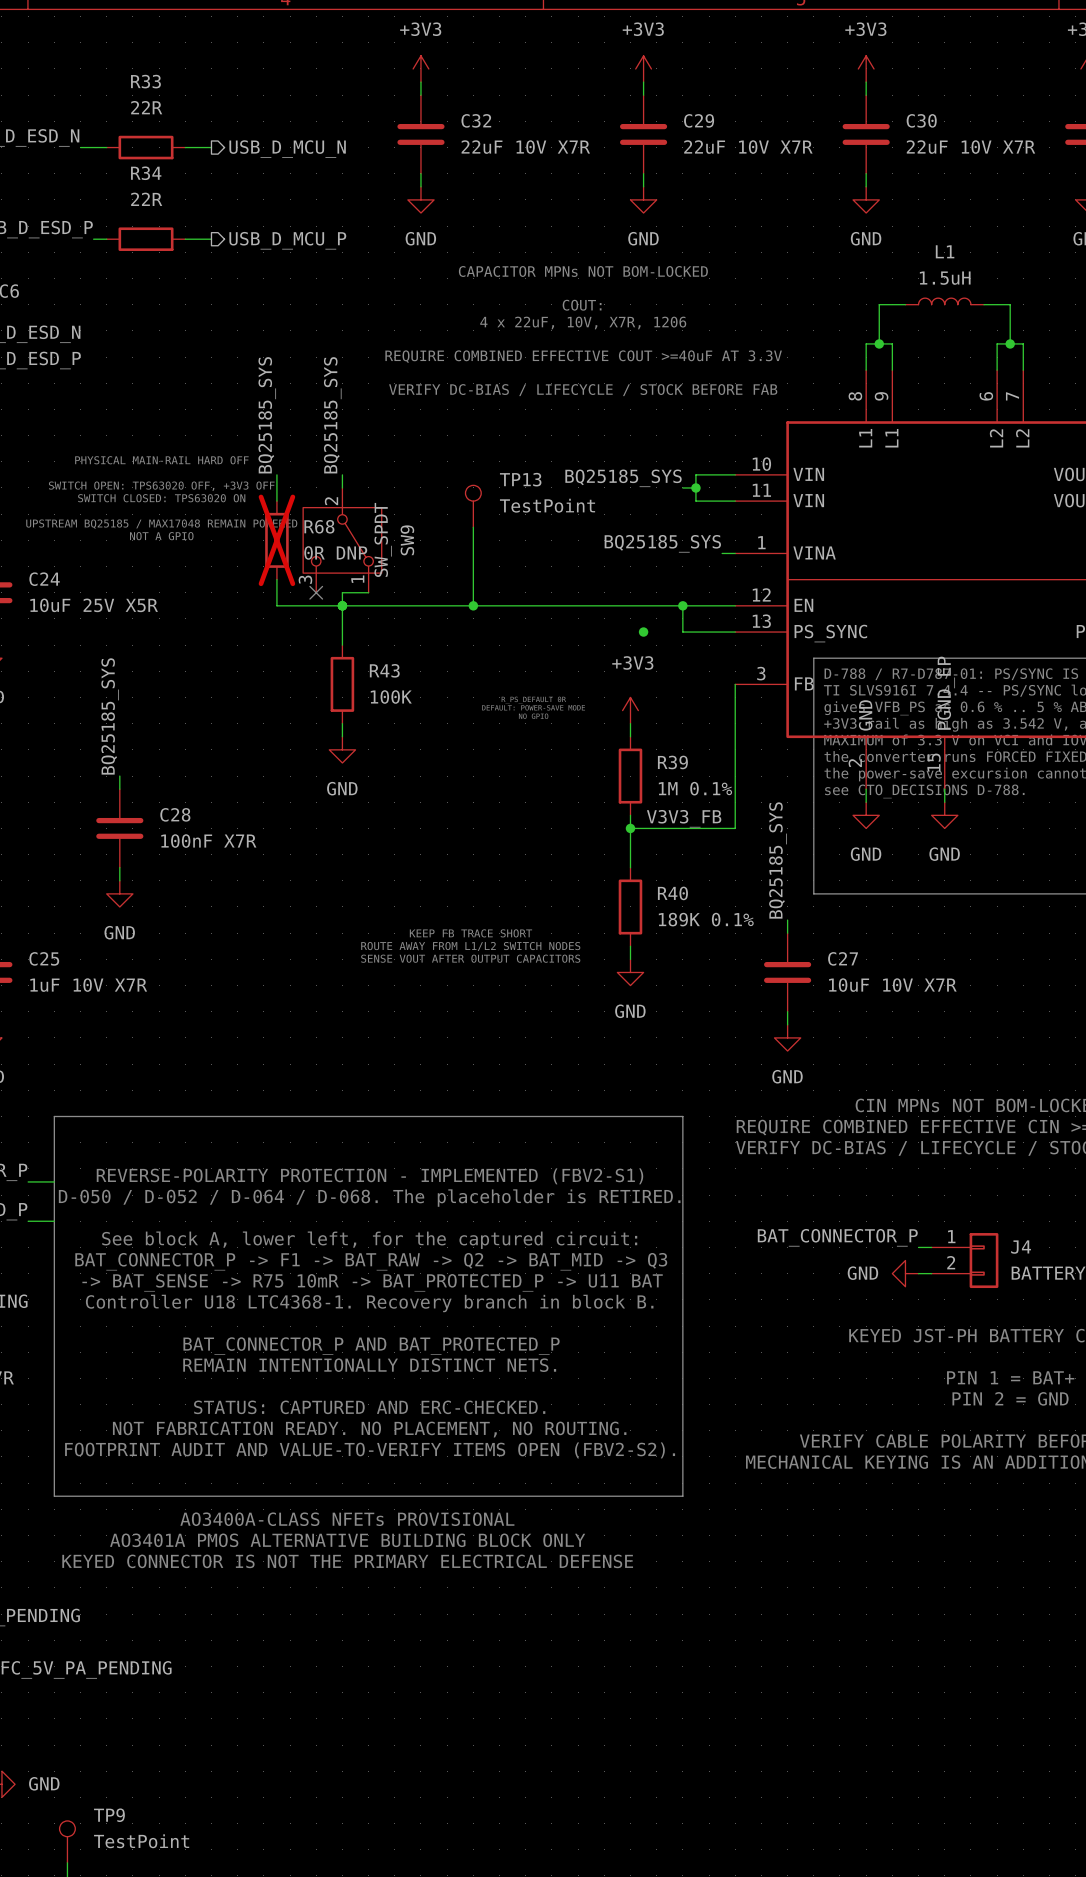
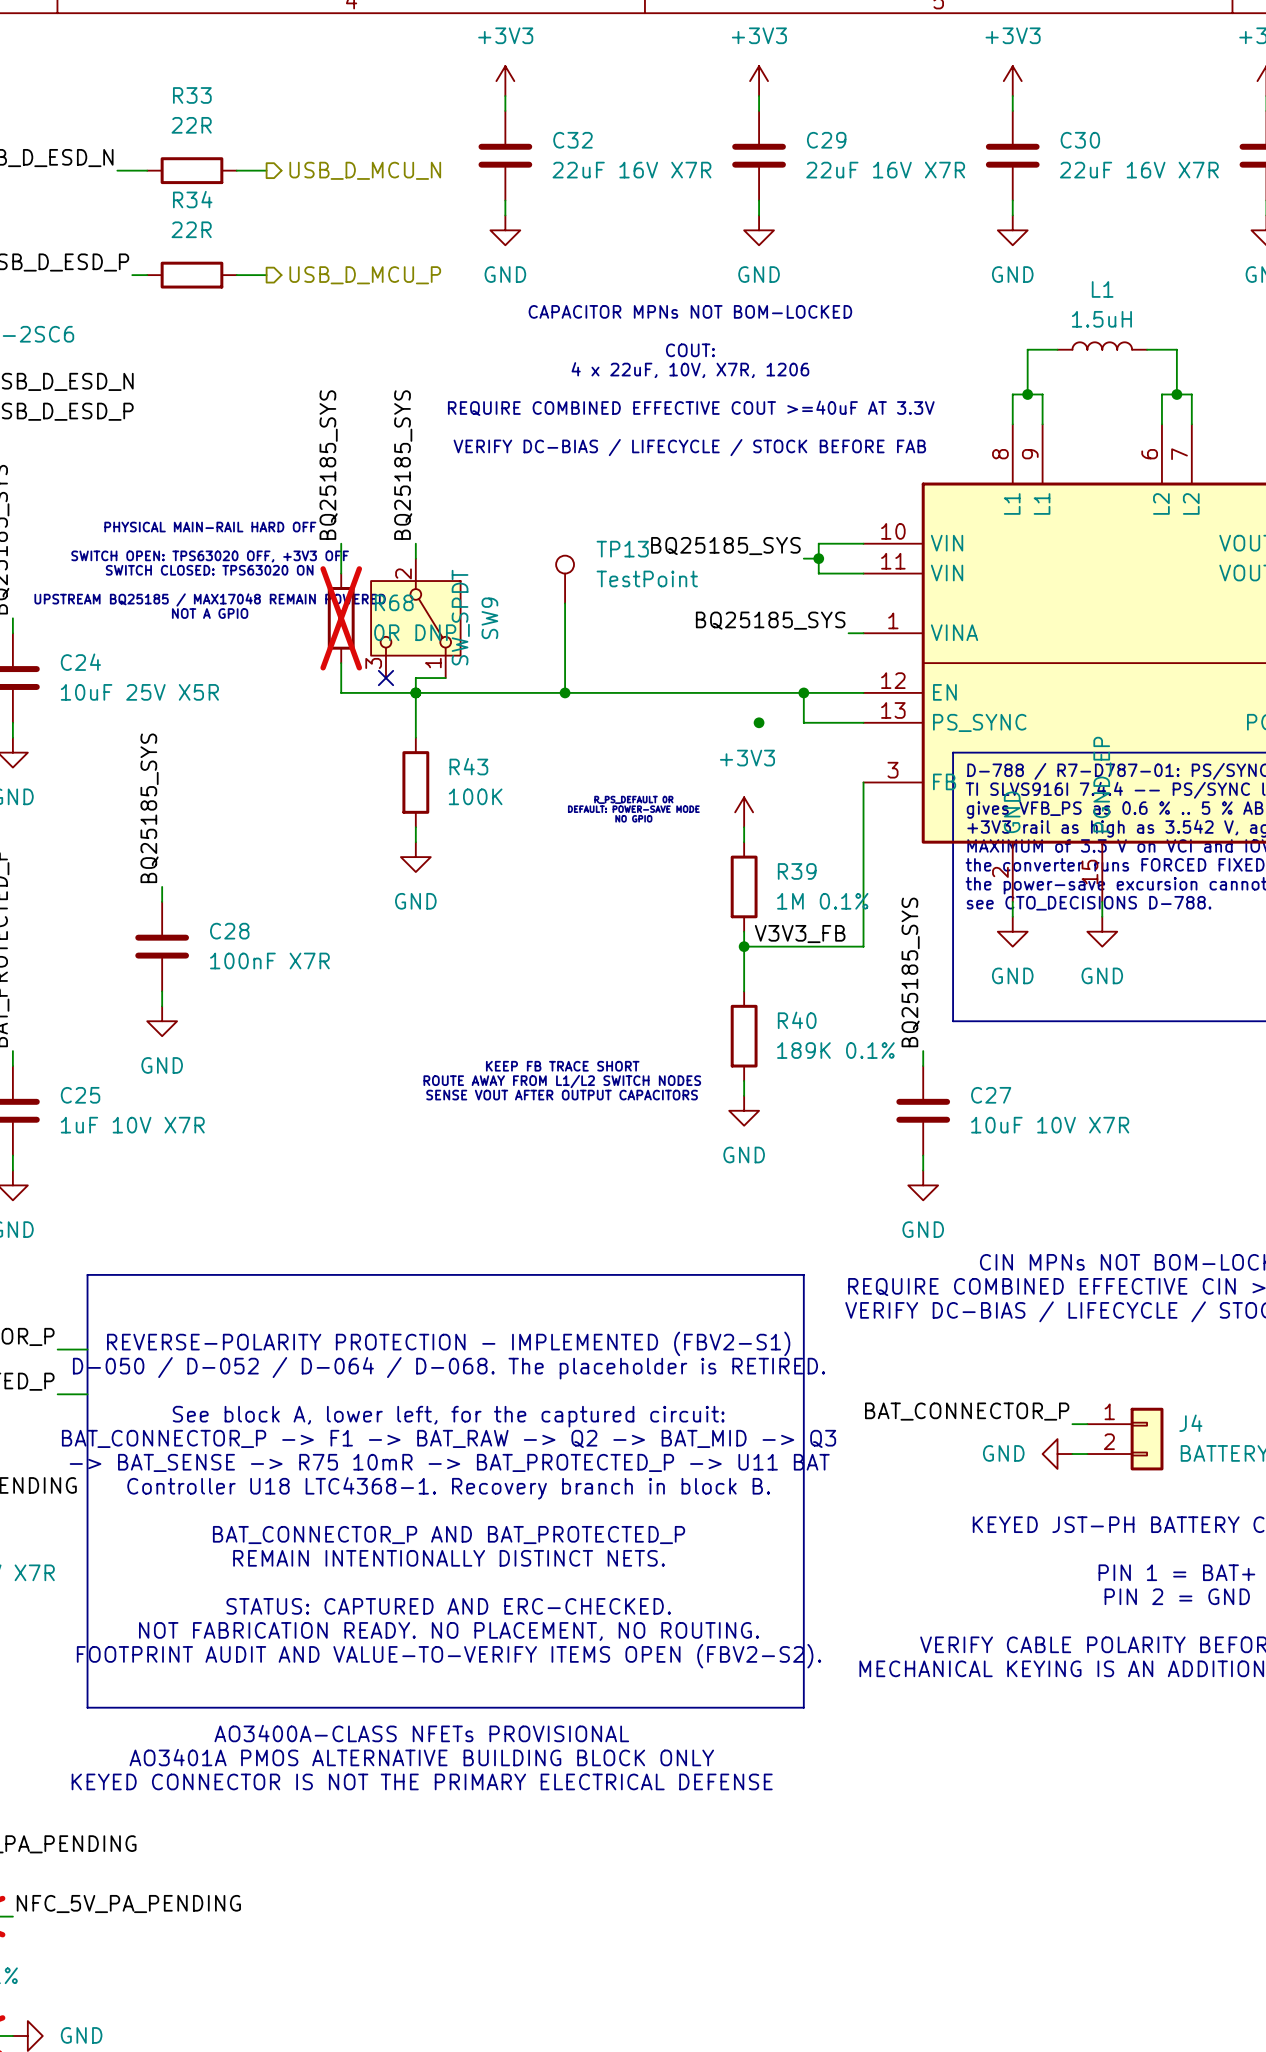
C32 value: 22uF 10V X7R (525, 147) -> 22uF 16V X7R (631, 170)
C29 value: 22uF 10V X7R (748, 147) -> 22uF 16V X7R (885, 170)
C30 value: 22uF 10V X7R (971, 147) -> 22uF 16V X7R (1139, 170)

